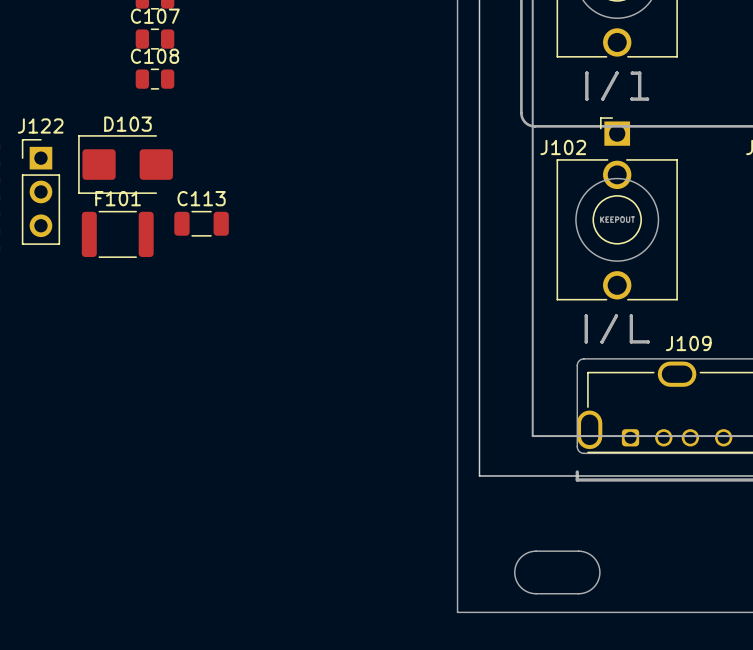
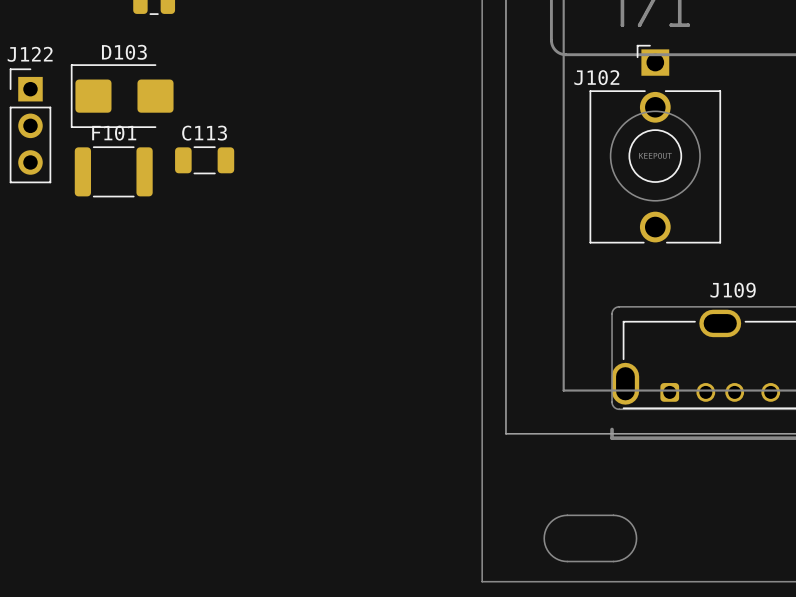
line: (586, 315) (585, 315) (586, 342) (586, 341) (586, 315) -> none
line: (616, 315) (601, 341) (601, 342) (616, 316) (616, 315) -> none
line: (631, 315) (631, 342) (648, 342) (631, 341) (631, 315) -> none

